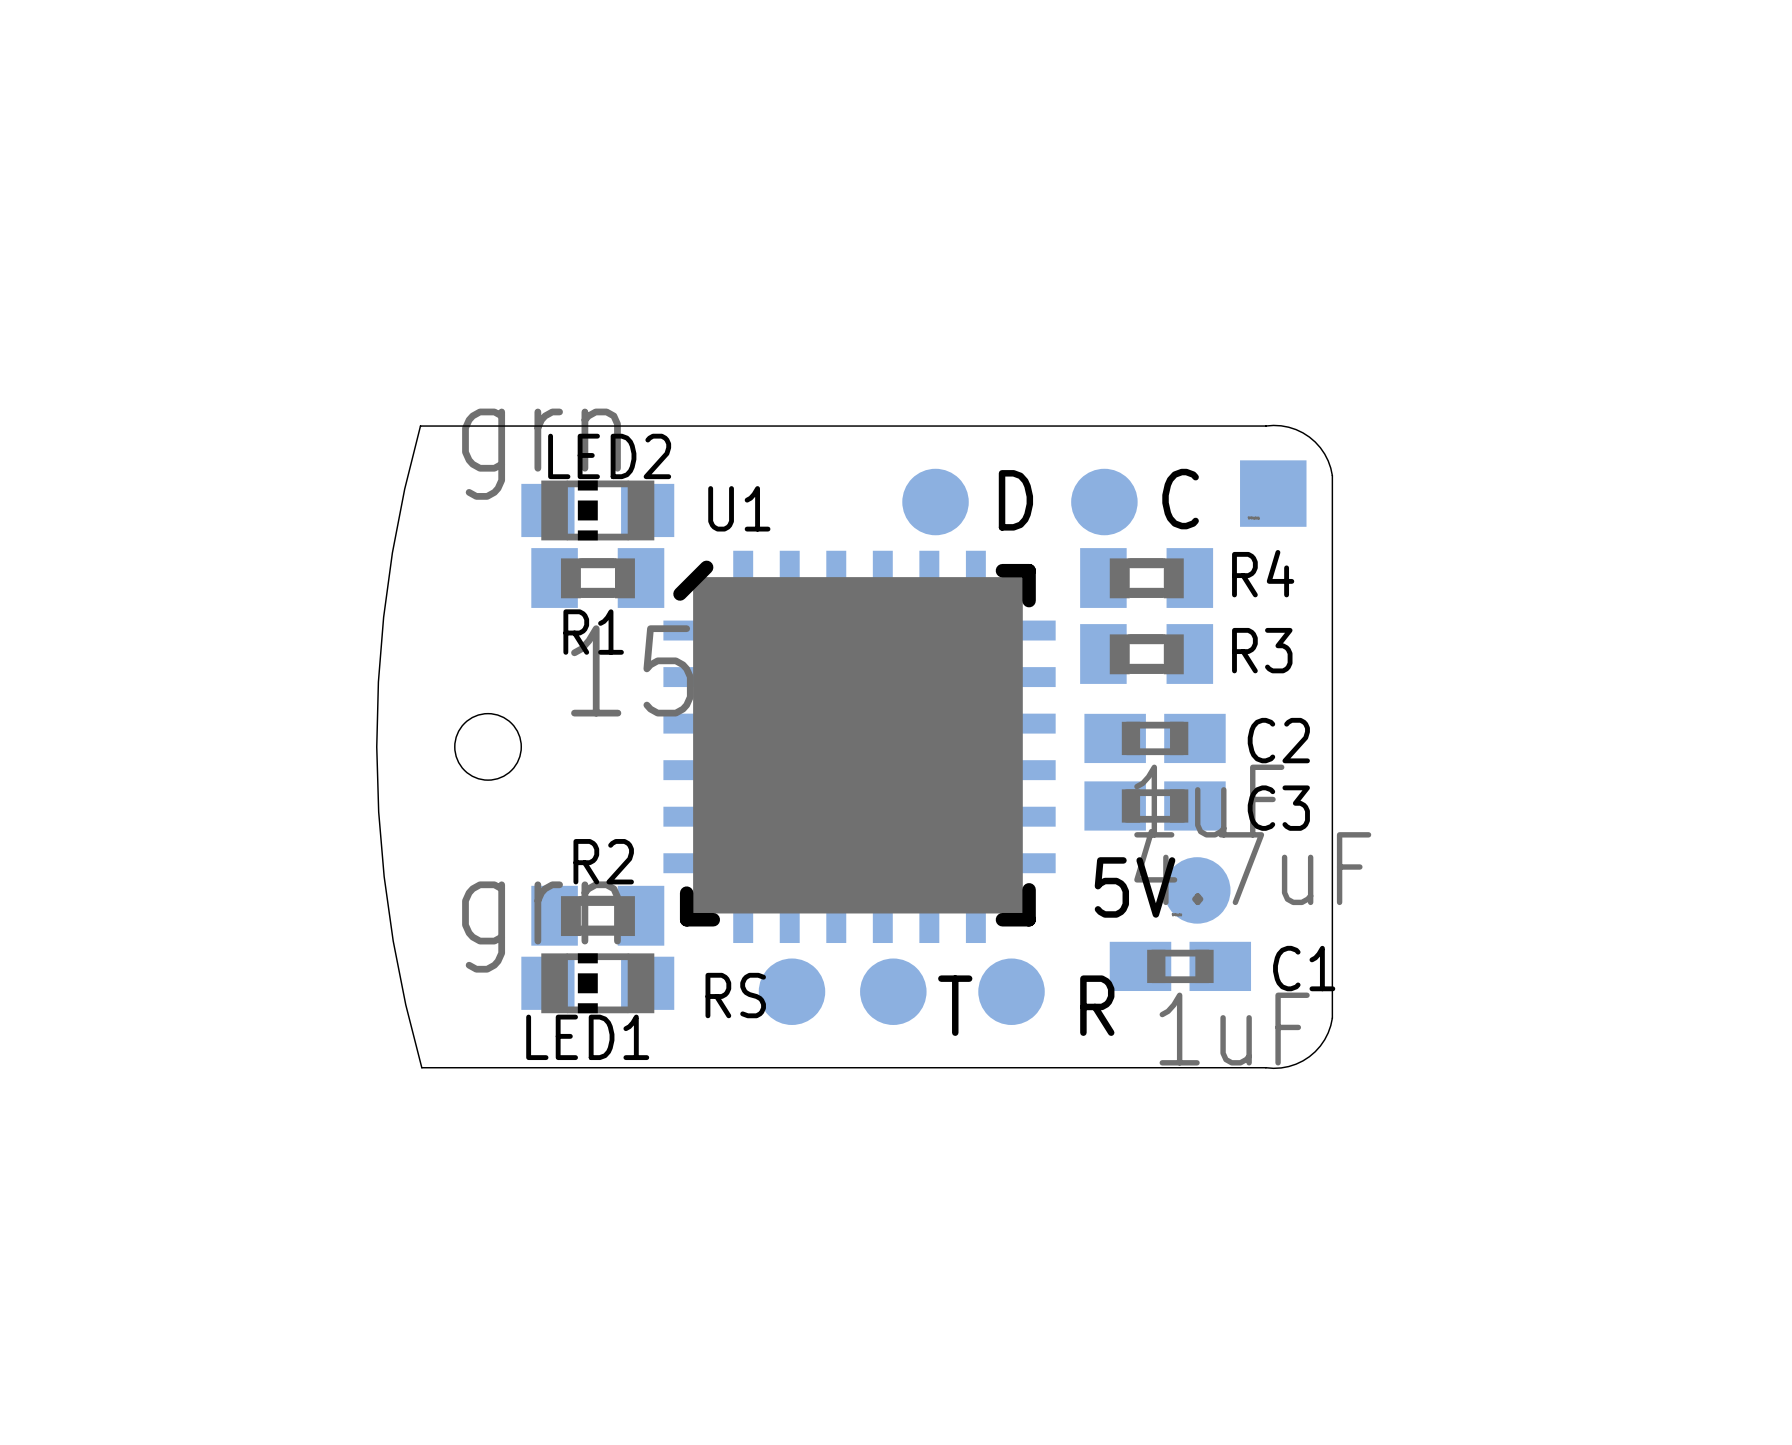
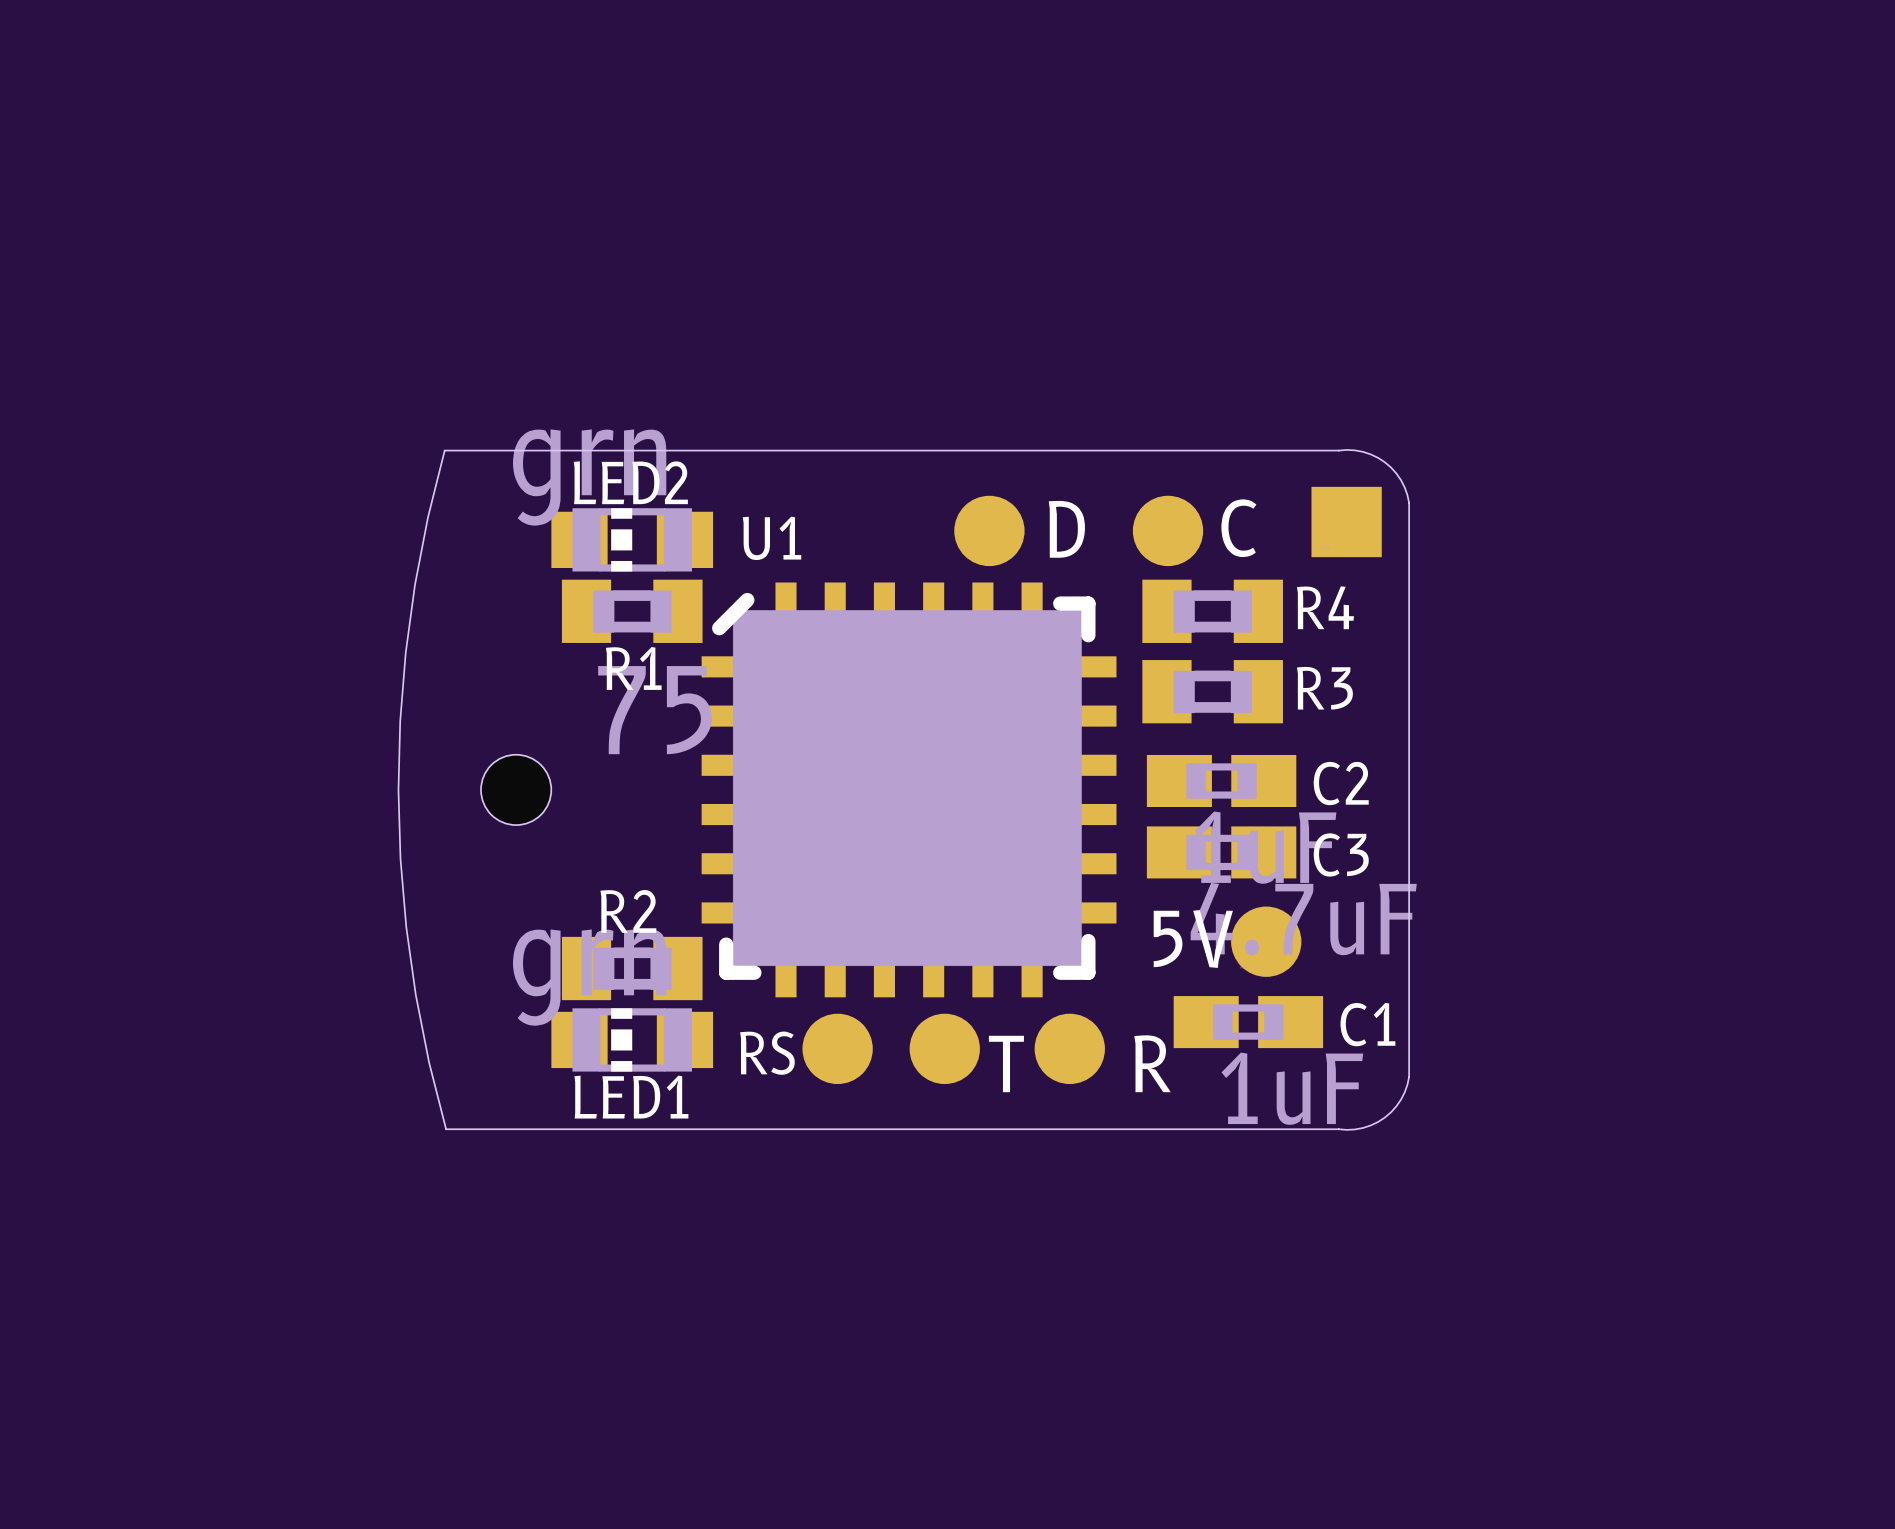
R1 value: 15 (632, 670) -> 75 (654, 710)

